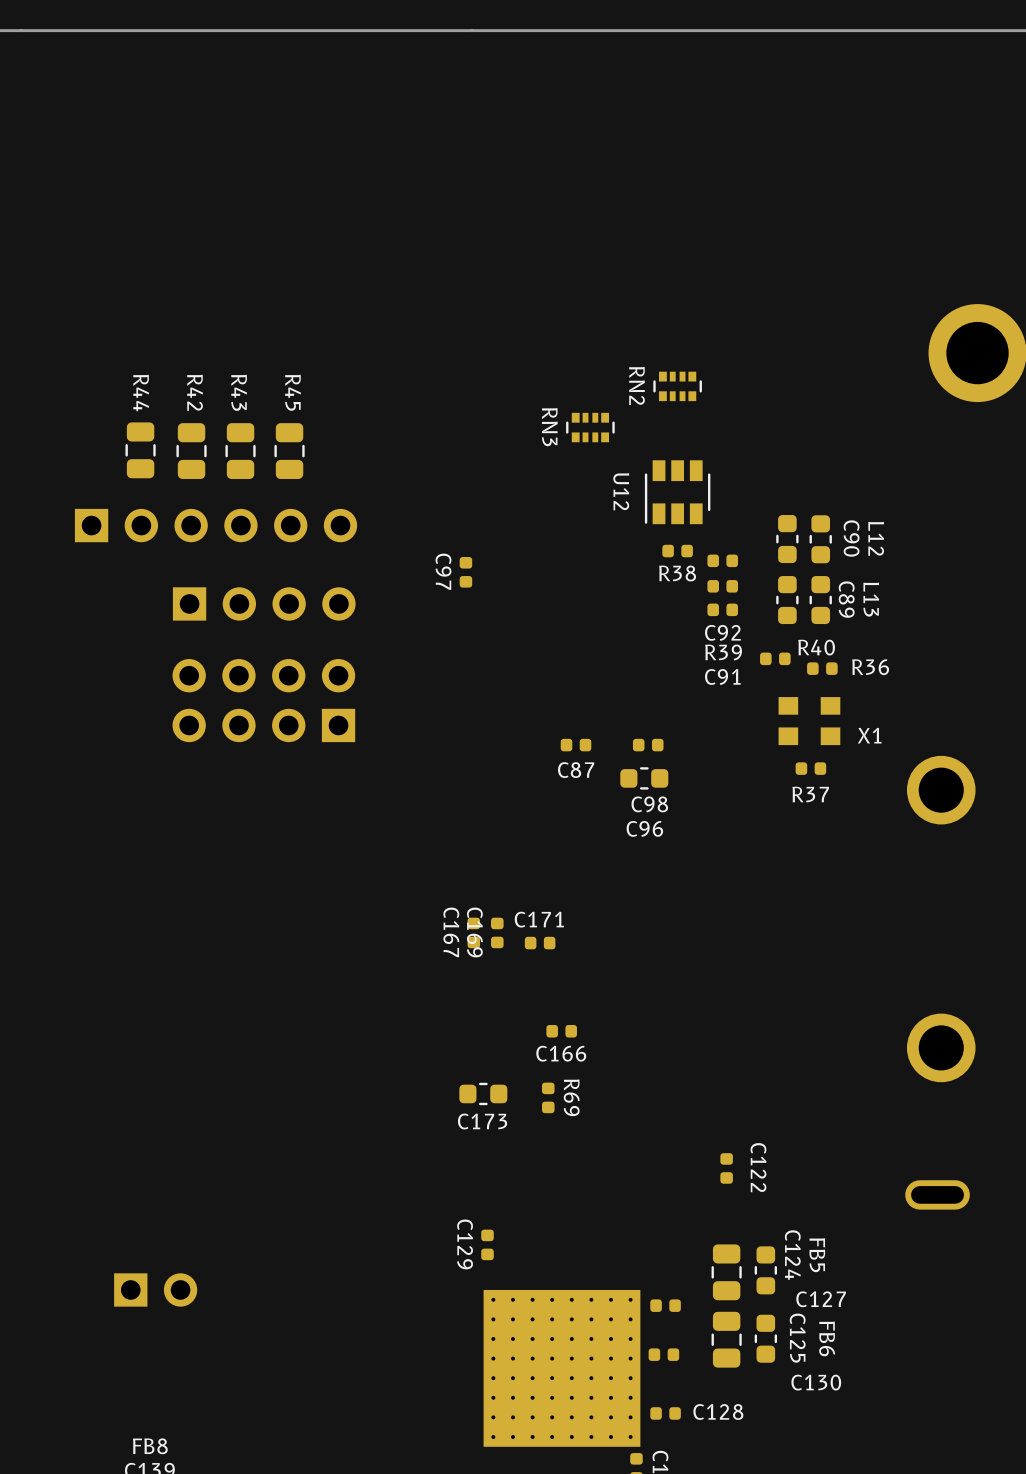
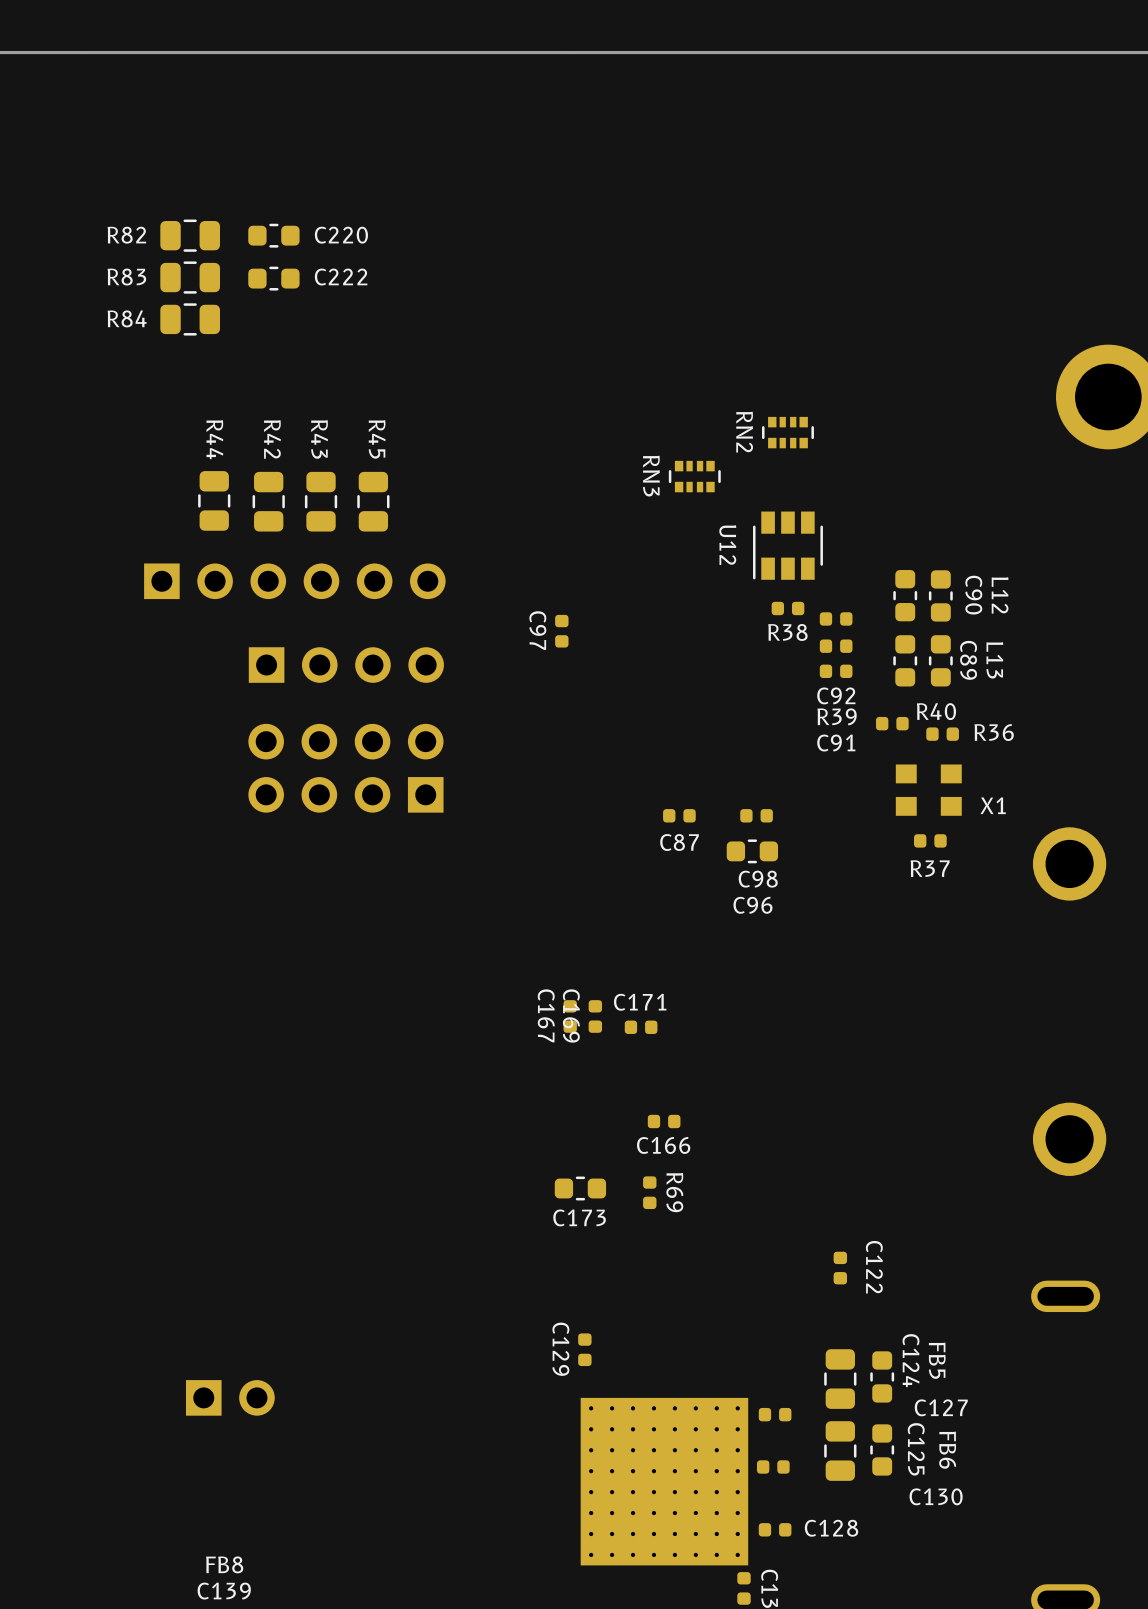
R82: none -> (190, 235)
C220: none -> (273, 235)
R83: none -> (190, 277)
C222: none -> (273, 278)
R84: none -> (190, 319)

